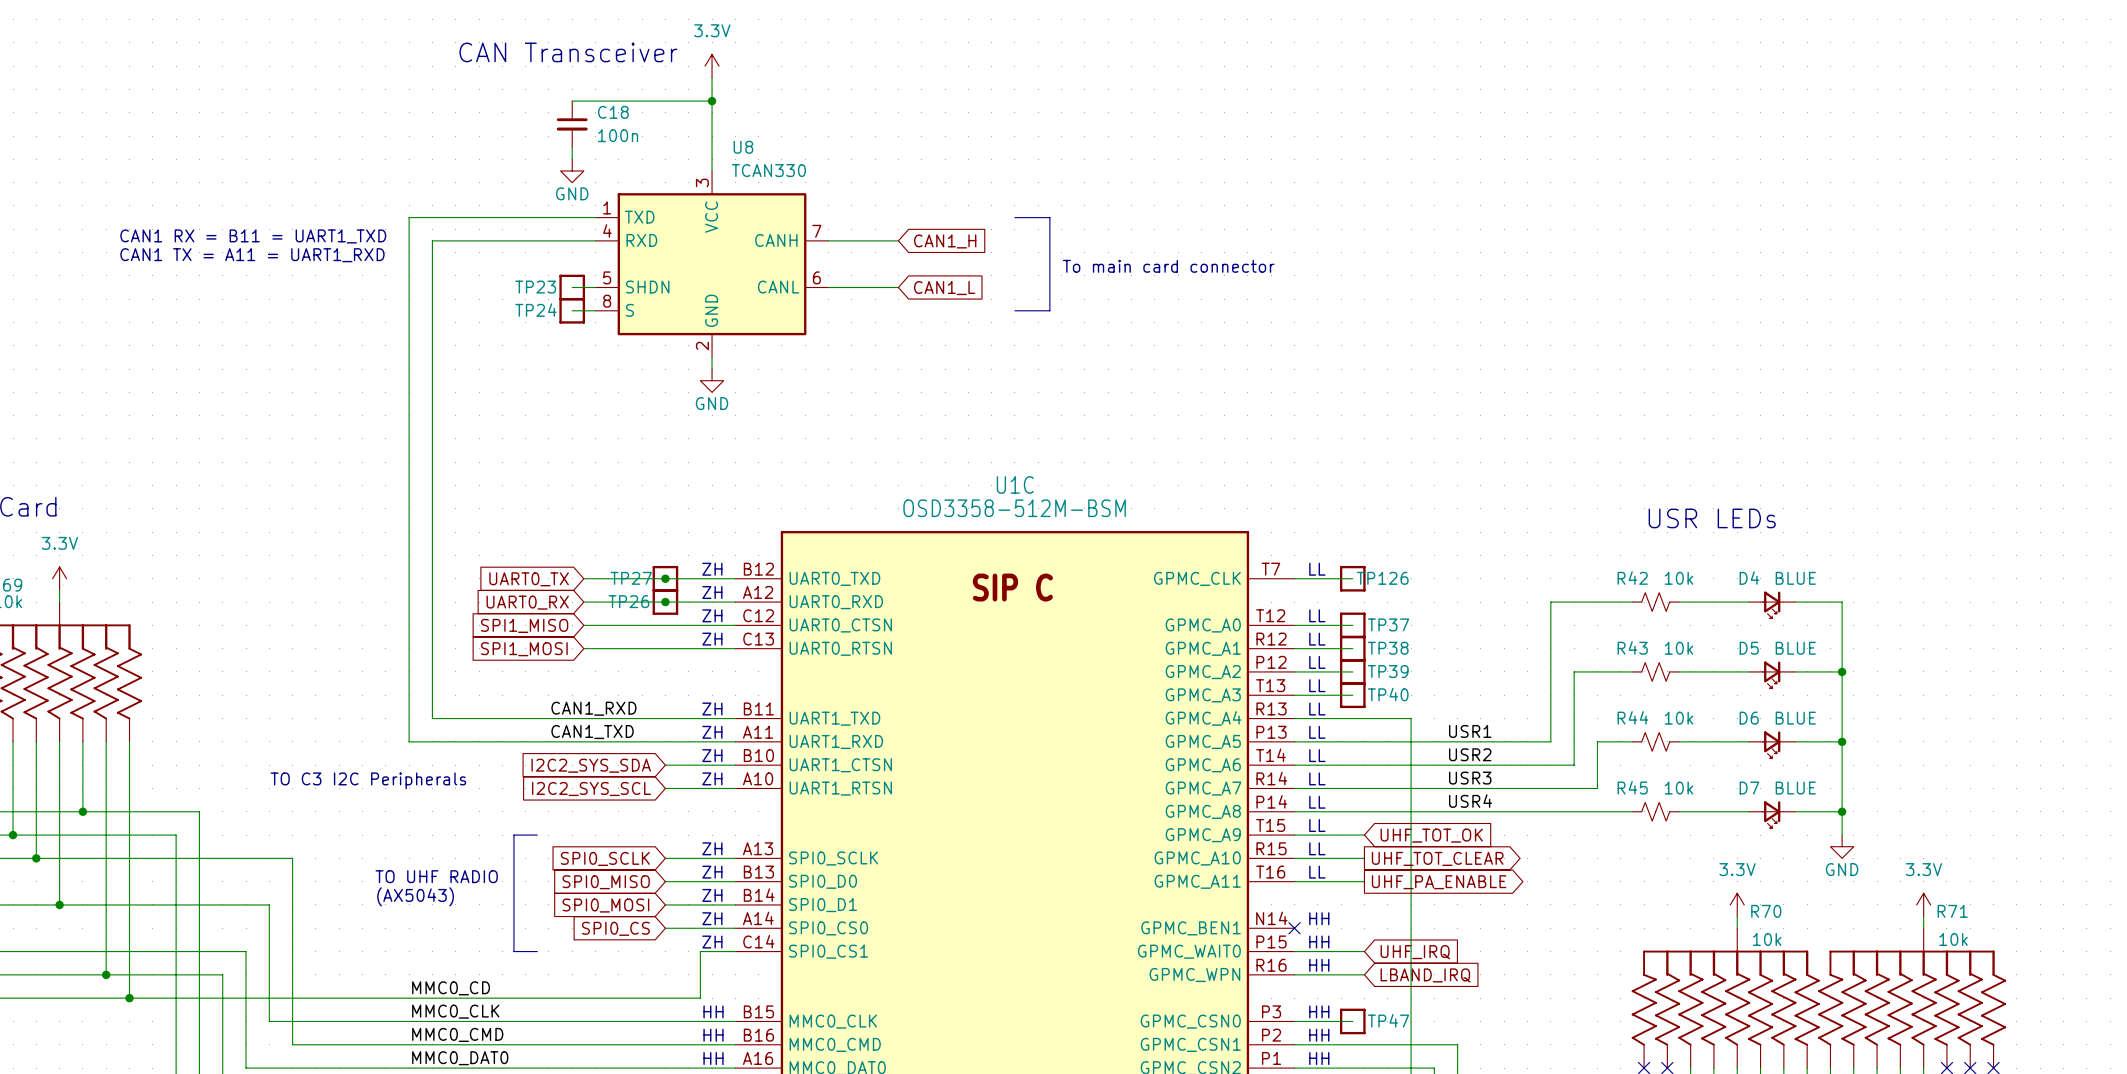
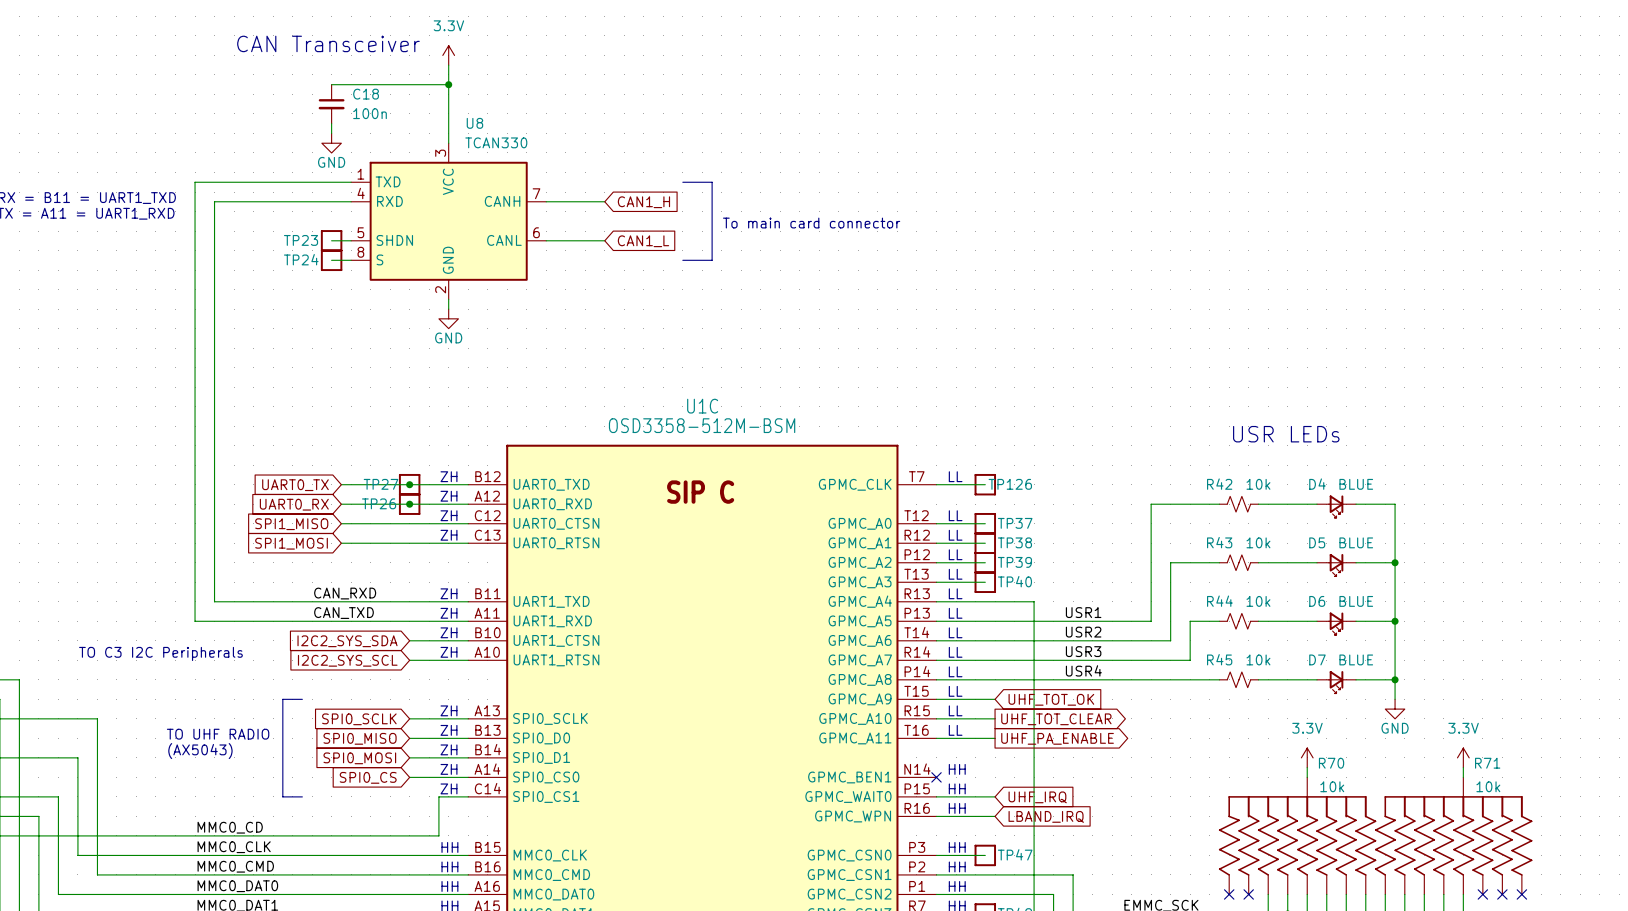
line: none -> (682, 182) (702, 182)
line: (1026, 217) (1049, 217) (1049, 310) (1026, 310) -> (712, 182) (712, 260)
text position: To main card connector (1168, 266) -> To main card connector (811, 223)
line: none -> (682, 260) (702, 260)
label: CAN1_RXD (593, 708) -> CAN_RXD (345, 593)
label: CAN1_TXD (592, 732) -> CAN_TXD (343, 613)

